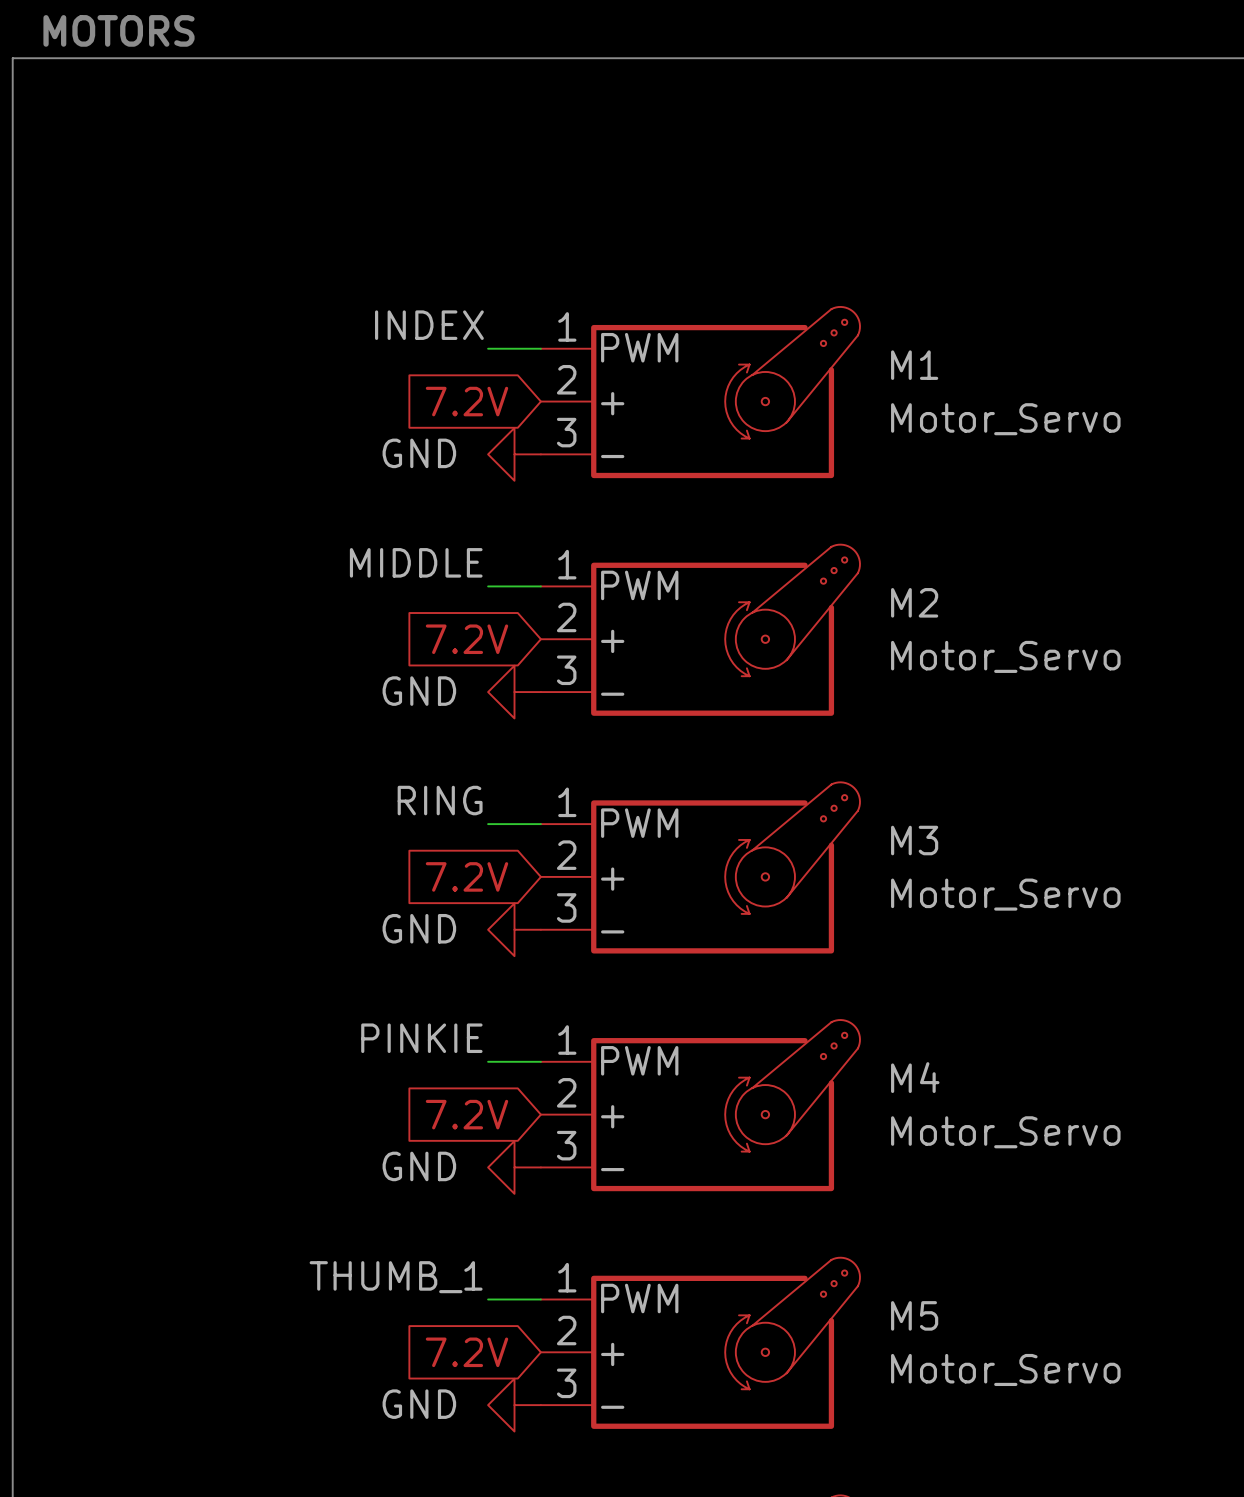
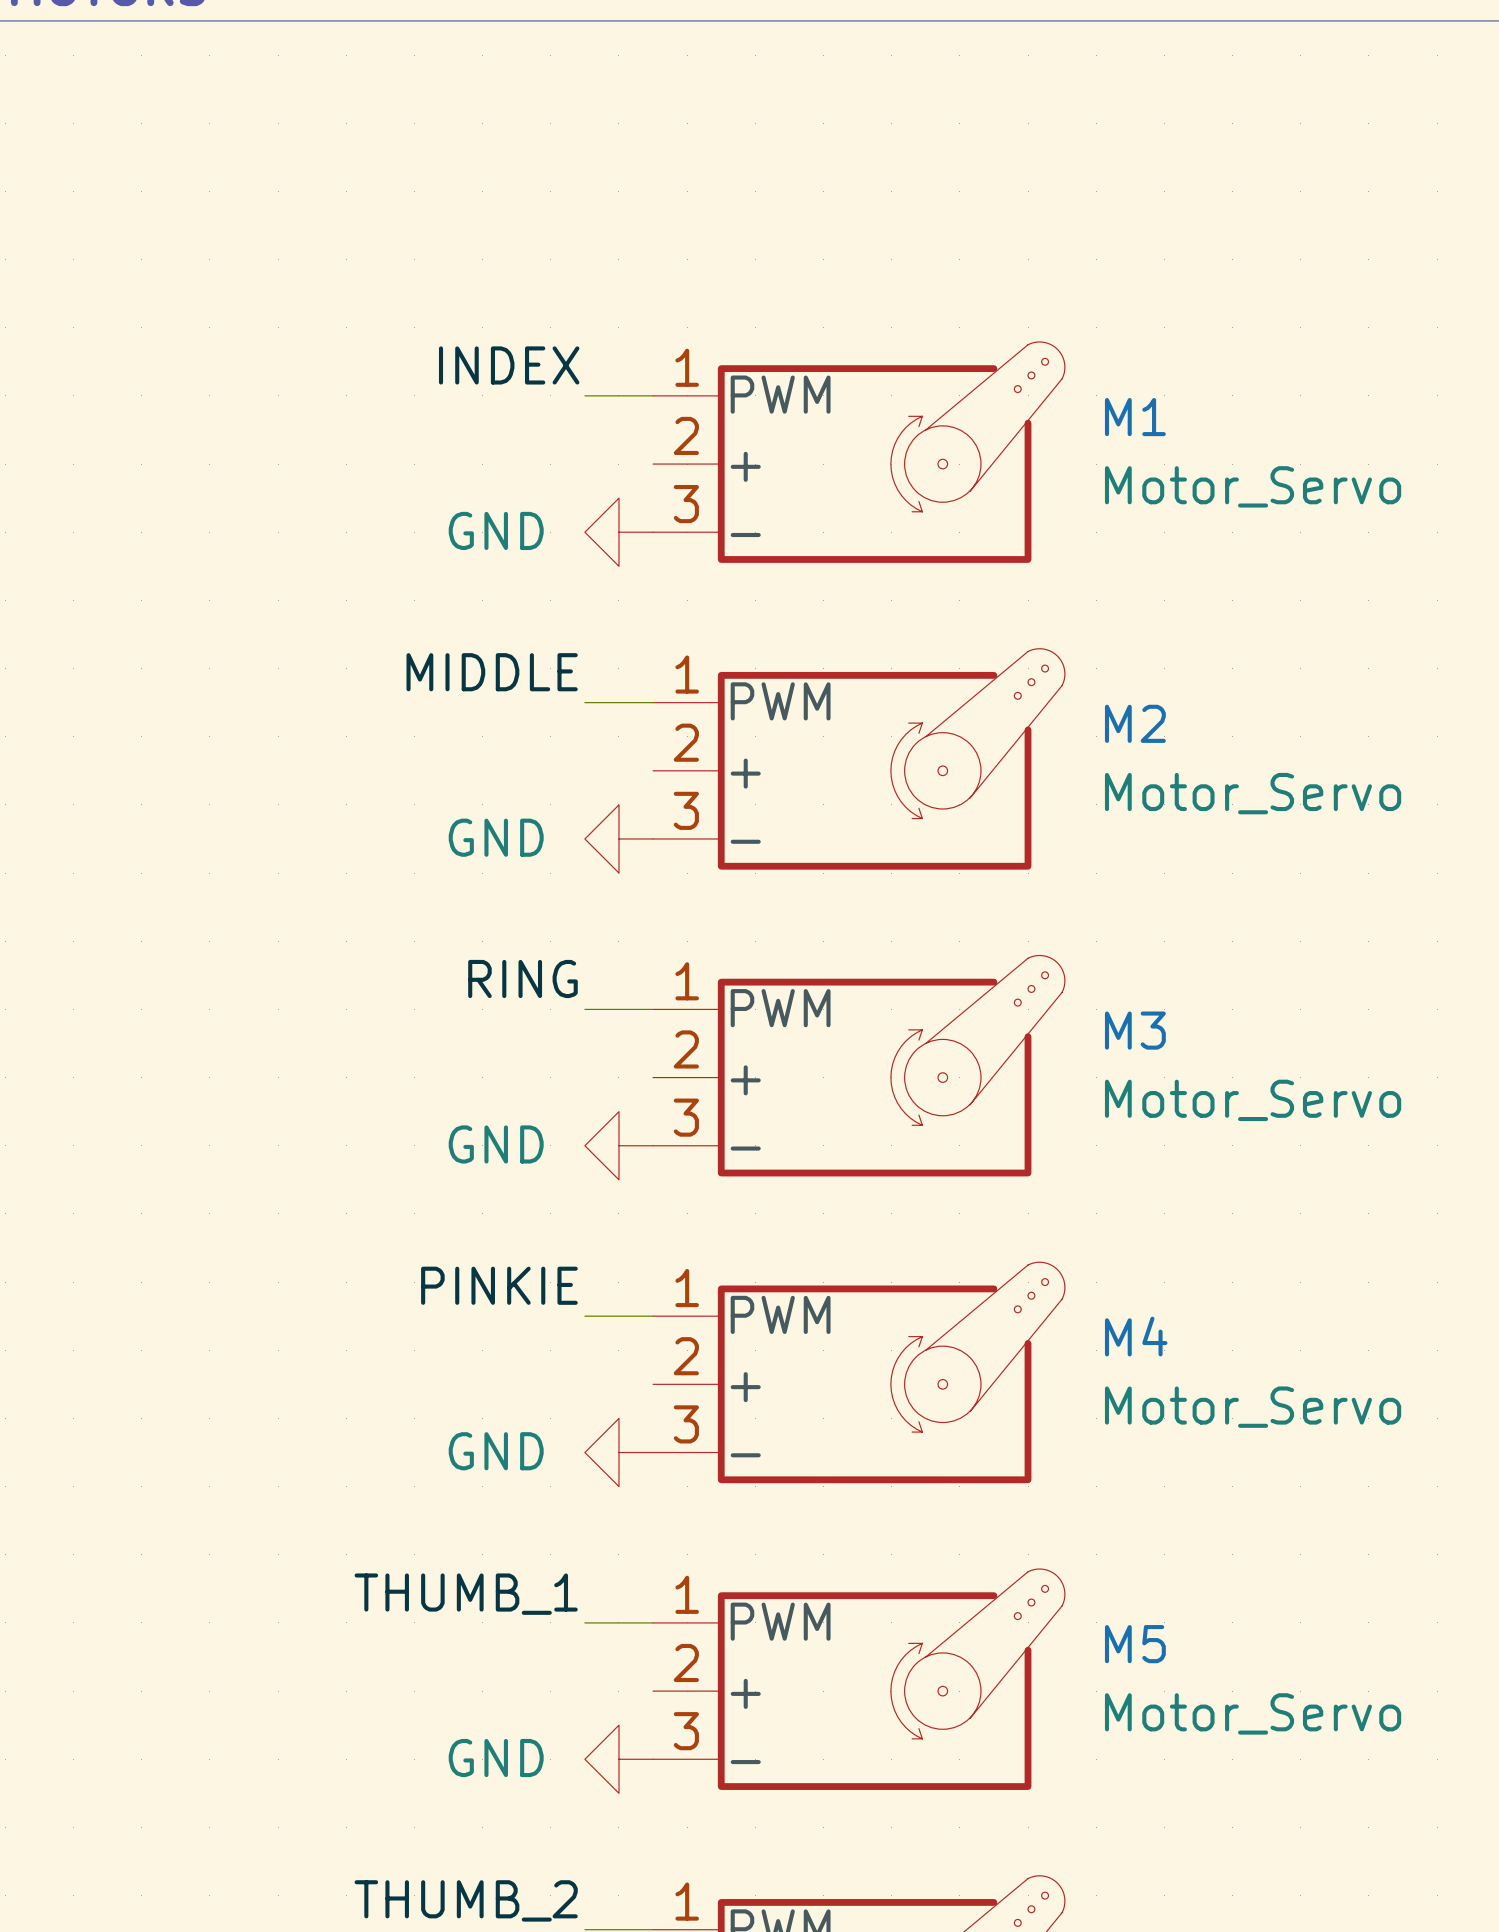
global label: 7.2V (466, 401) -> none
global label: 7.2V (466, 639) -> none
global label: 7.2V (466, 876) -> none
global label: 7.2V (466, 1114) -> none
global label: 7.2V (466, 1352) -> none

